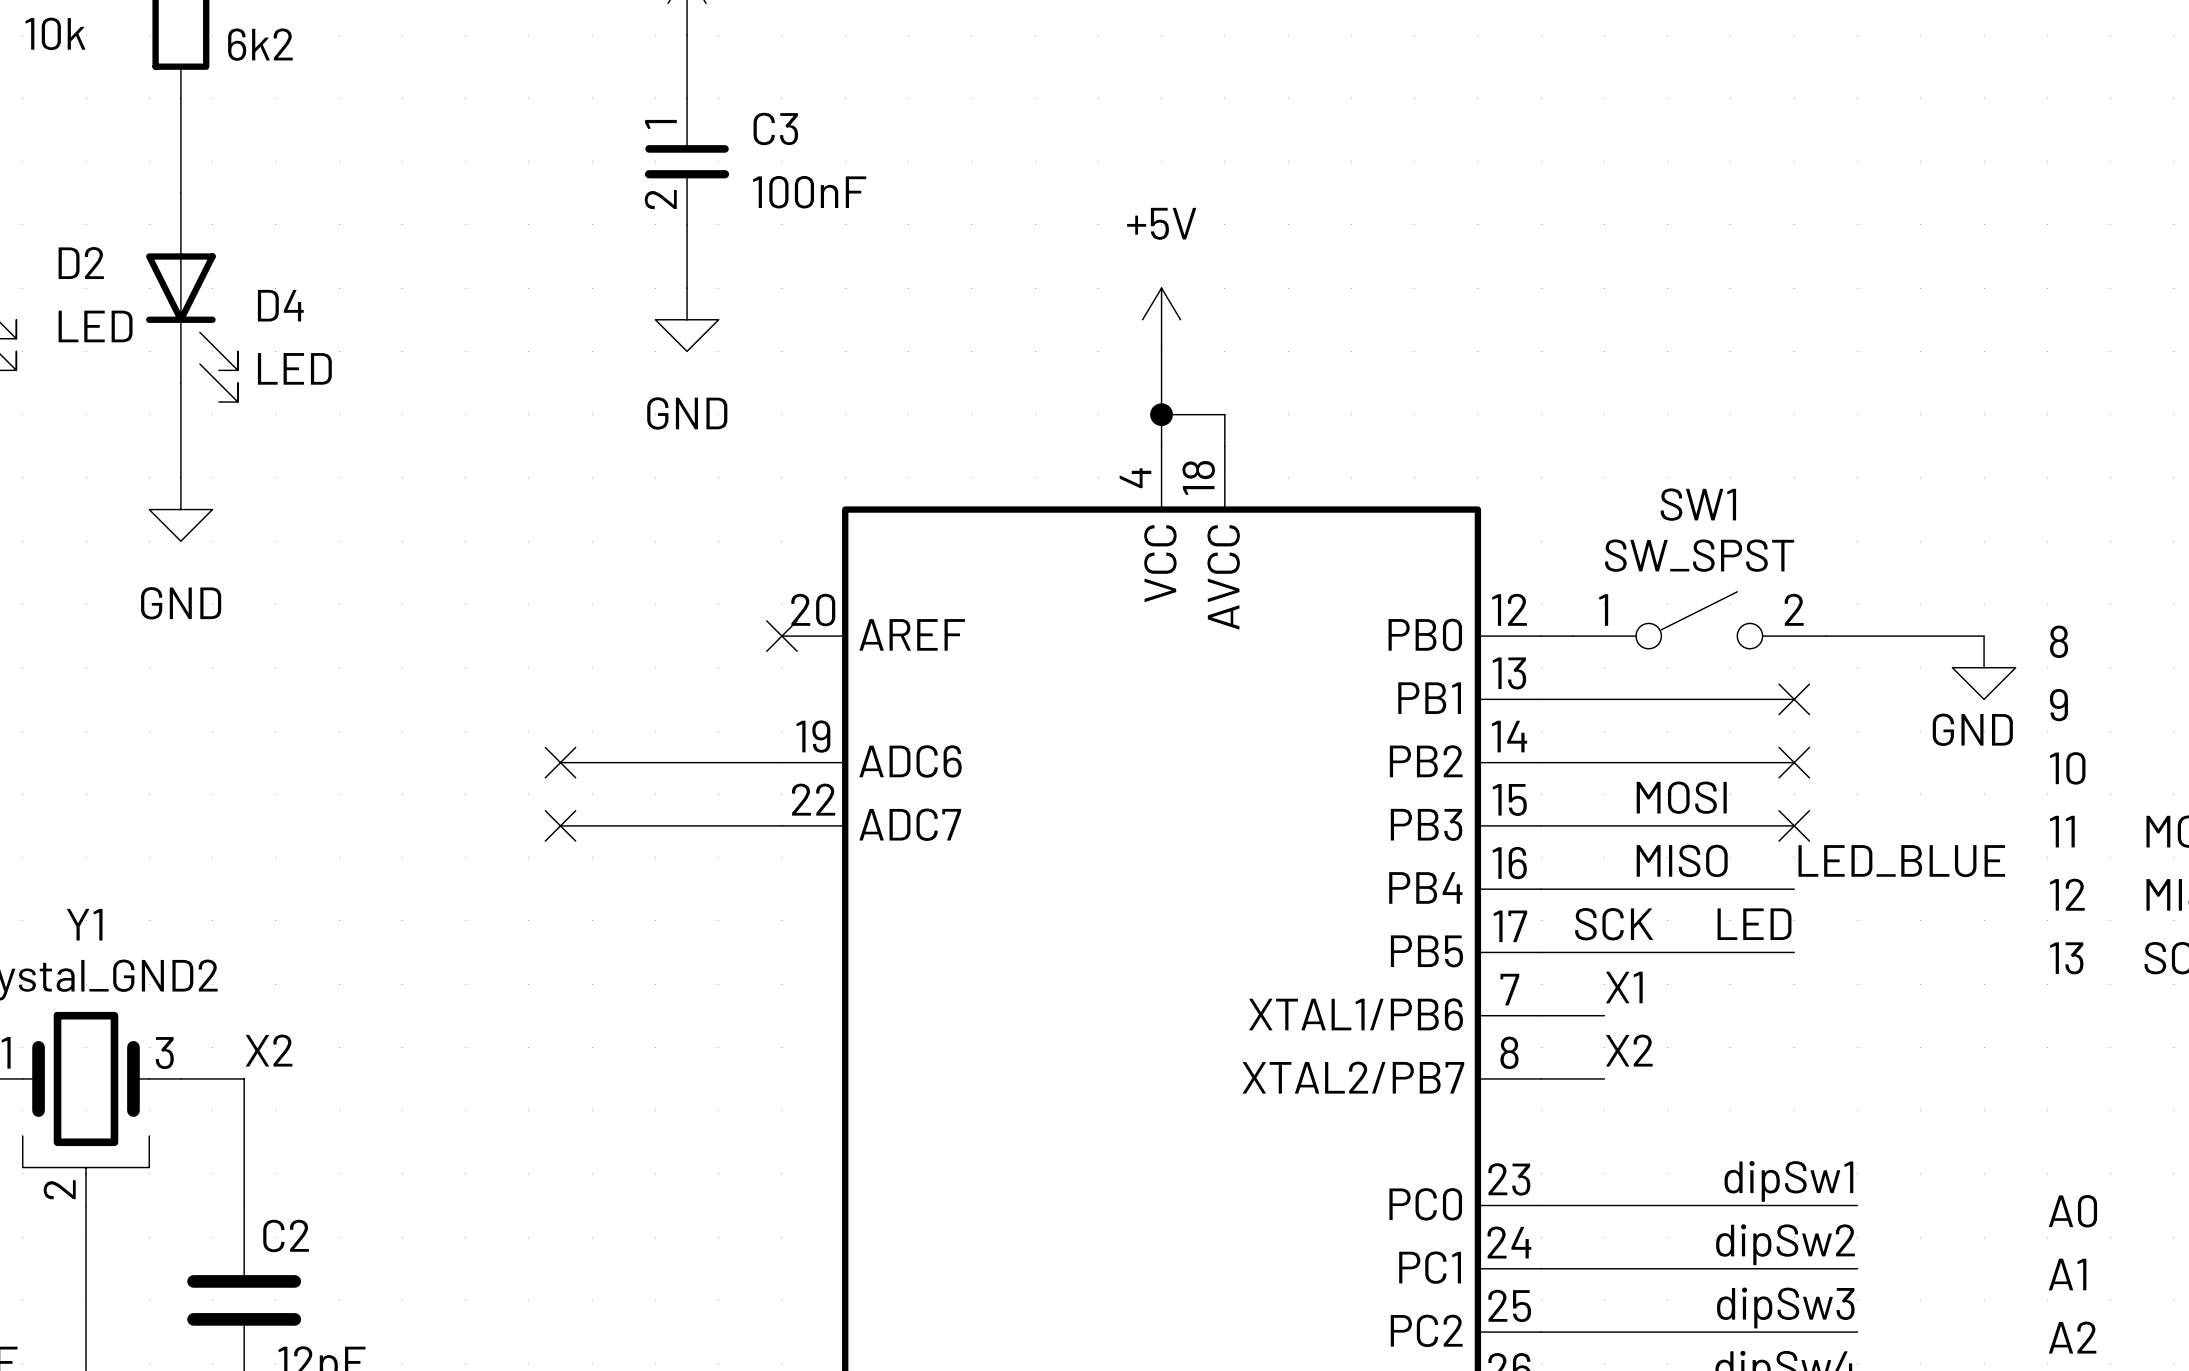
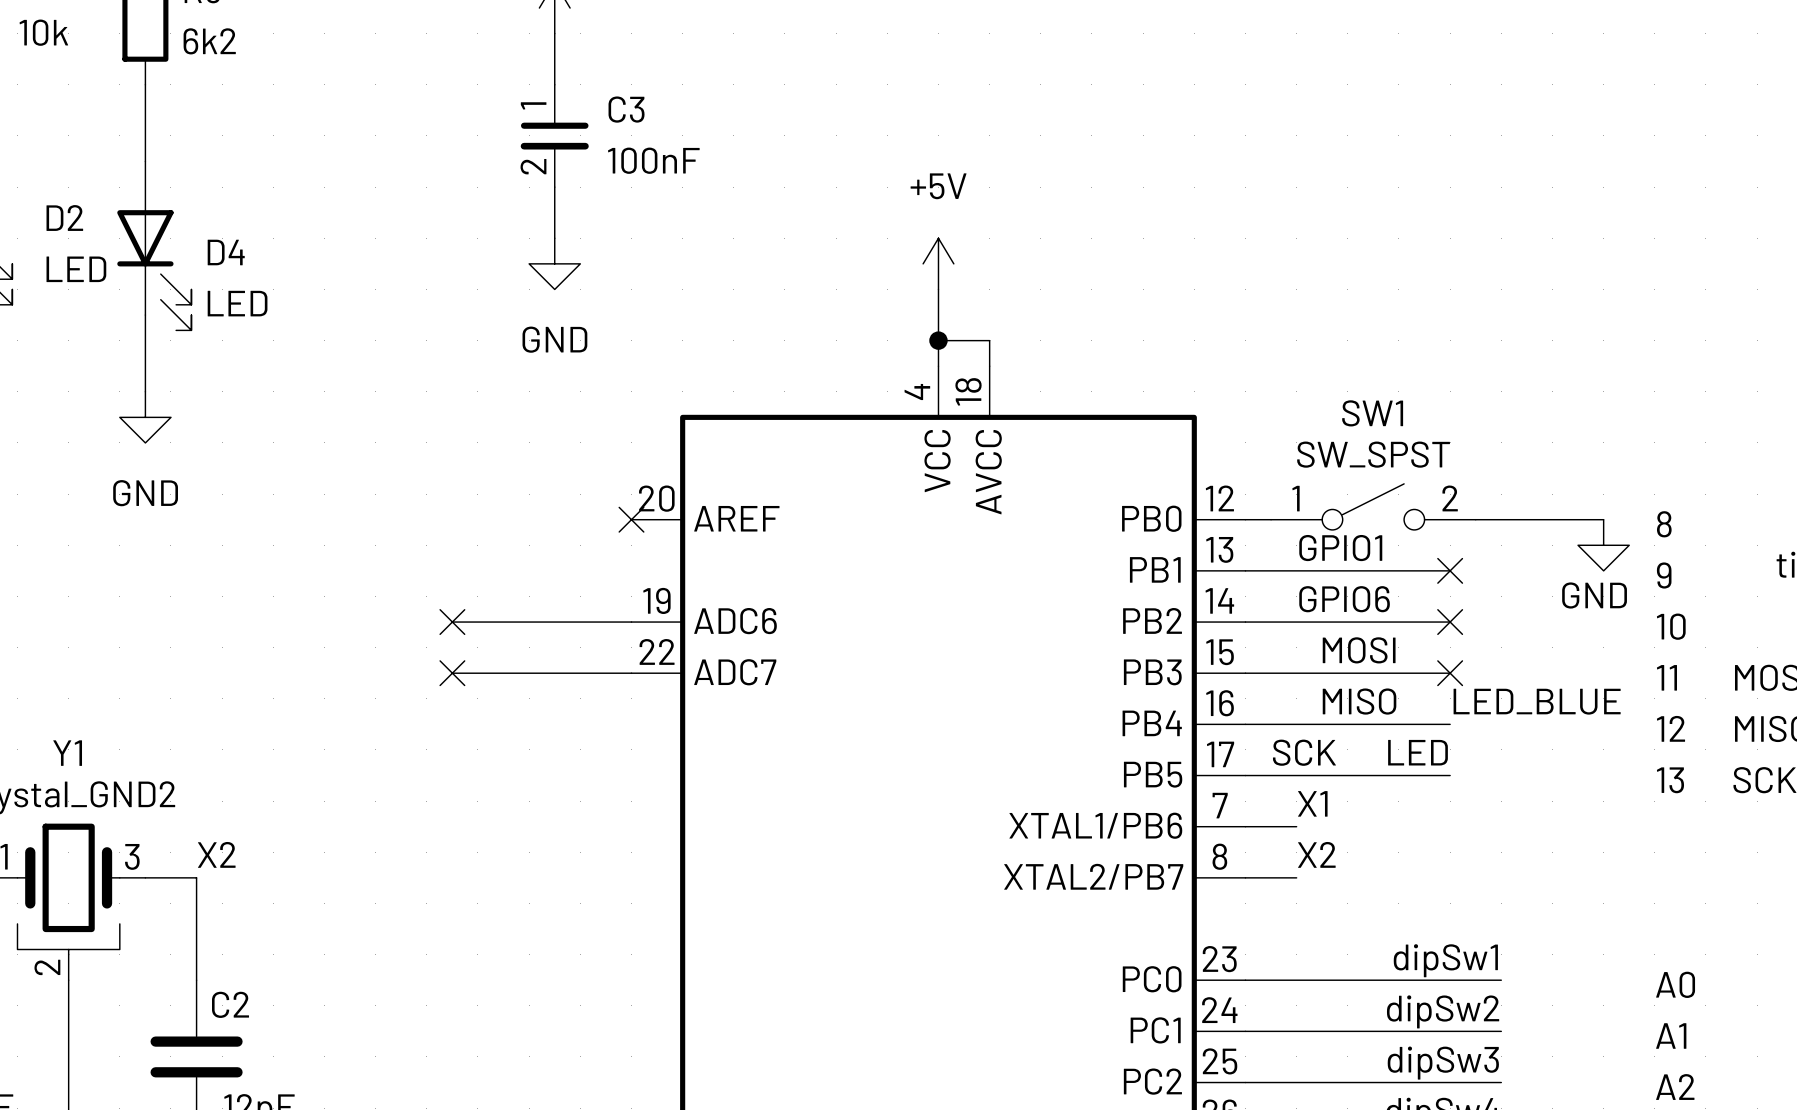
label: none -> GPIO1 (1340, 548)
label: none -> GPIO6 (1344, 599)

